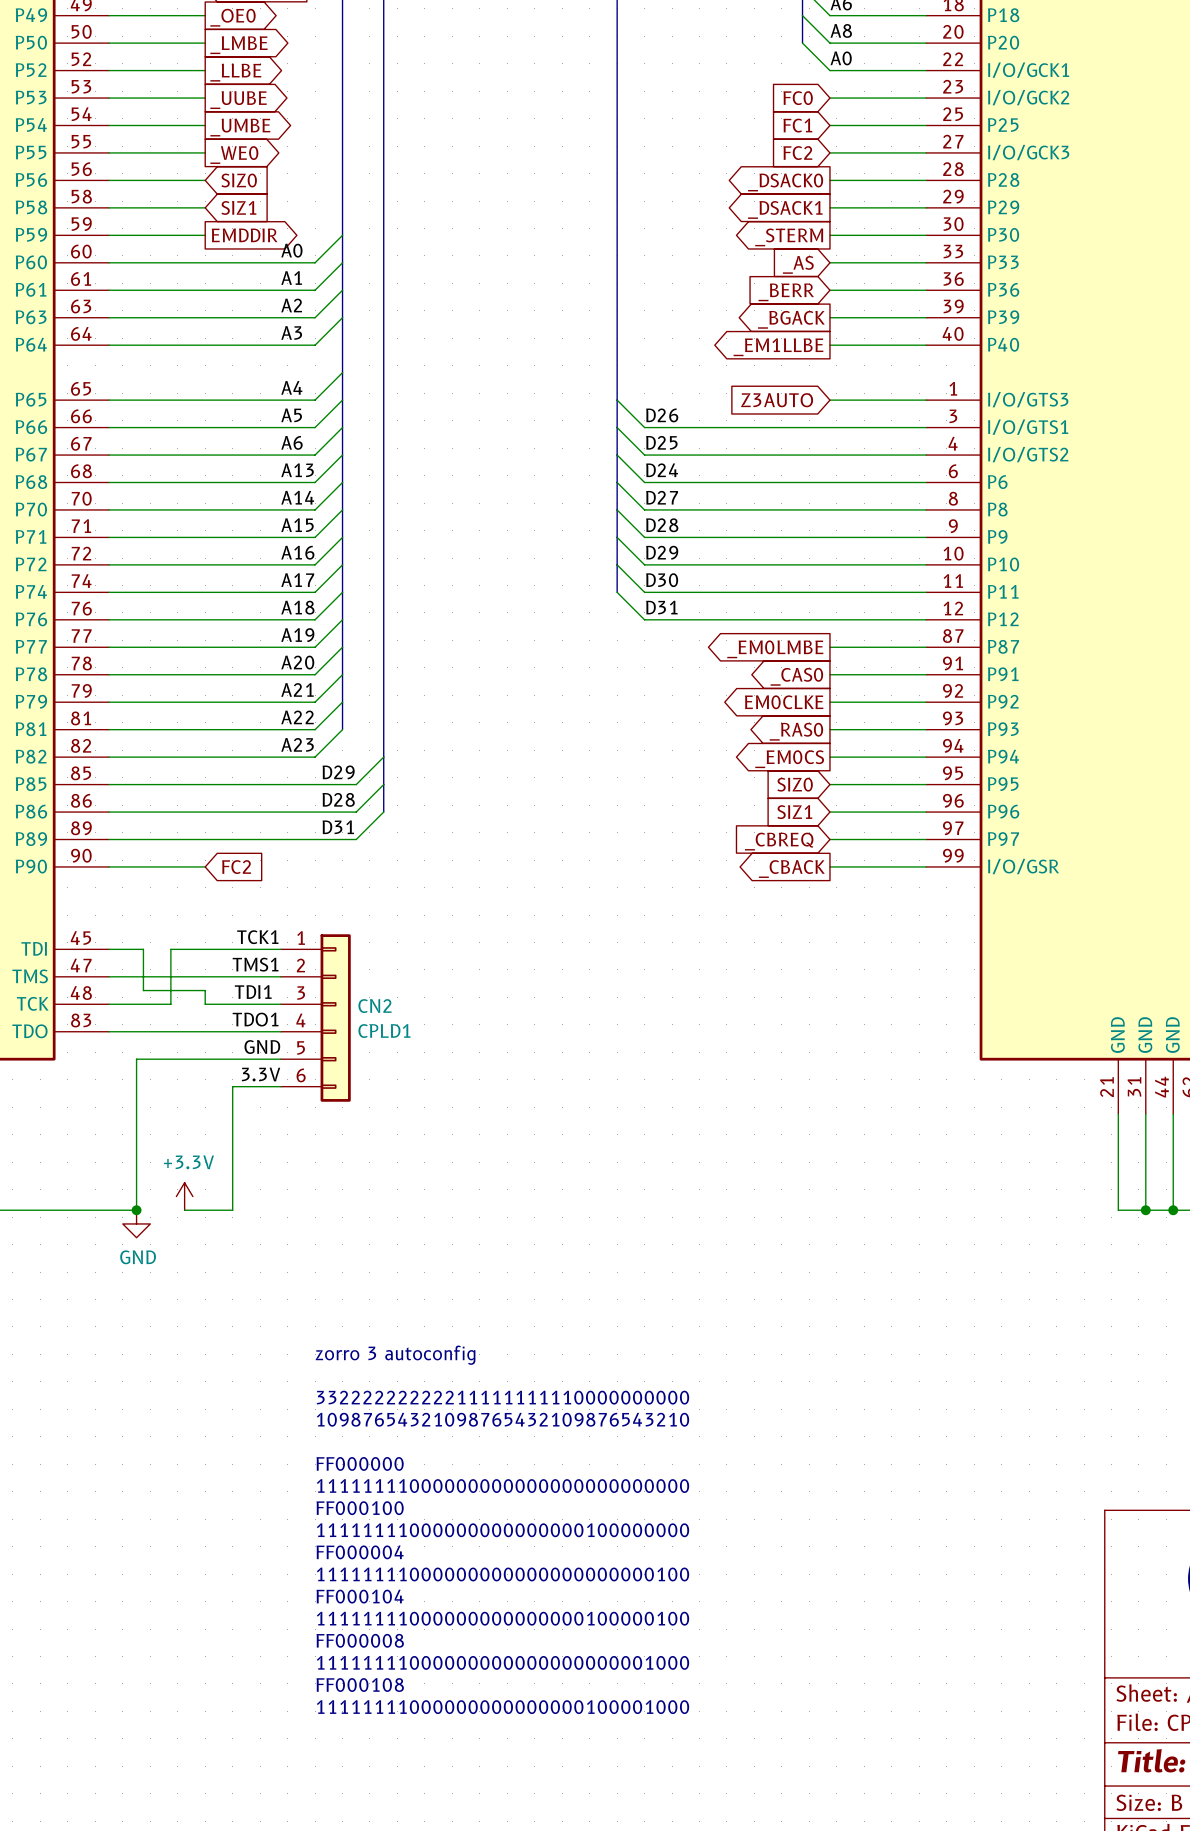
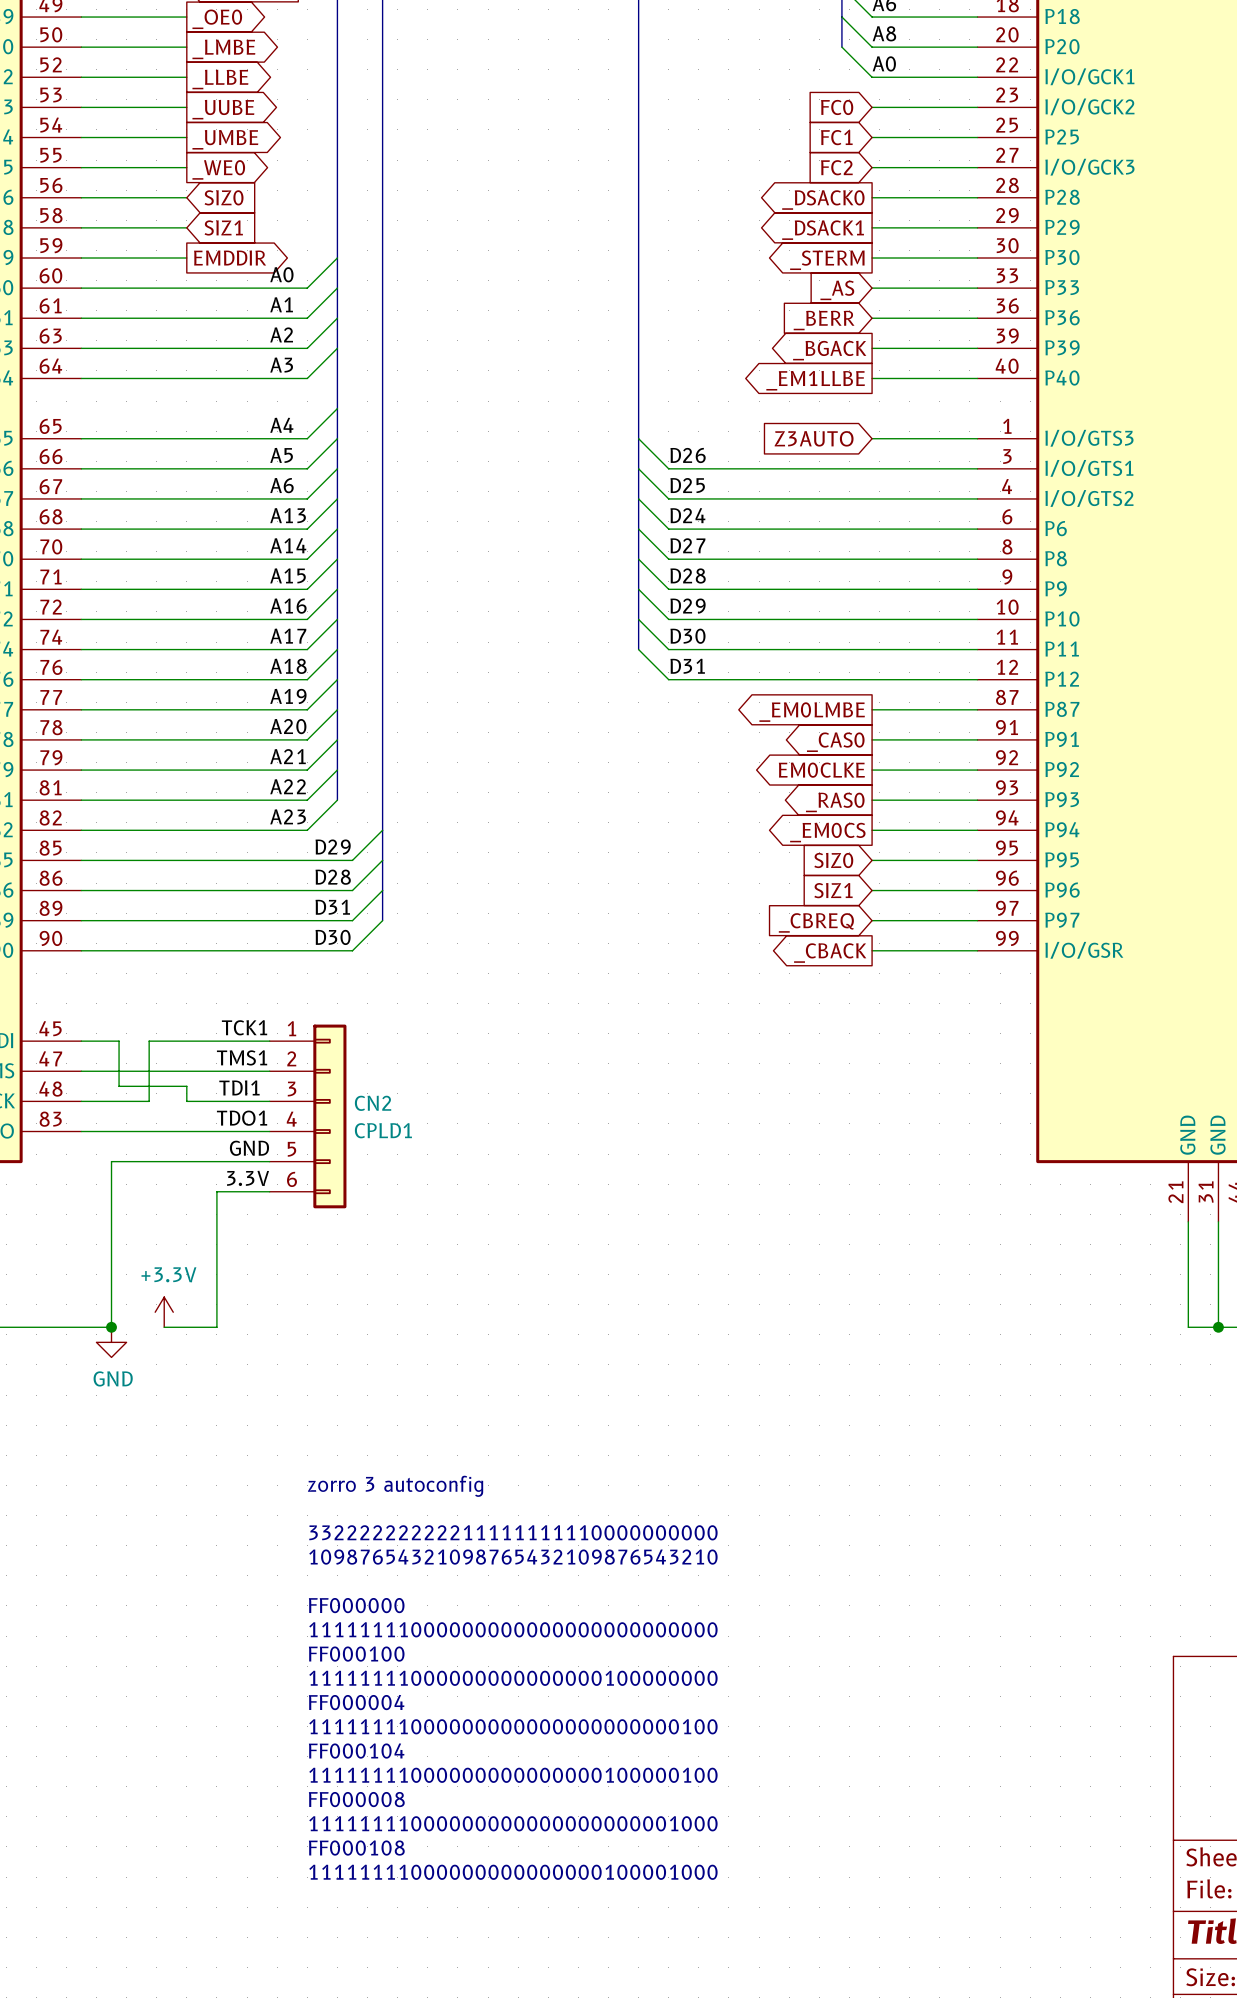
bus: none -> (382, 890) (382, 920)
wire: none -> (382, 920) (352, 950) (186, 950)
label: none -> D30 (333, 937)
global label: FC2 (236, 867) -> none

